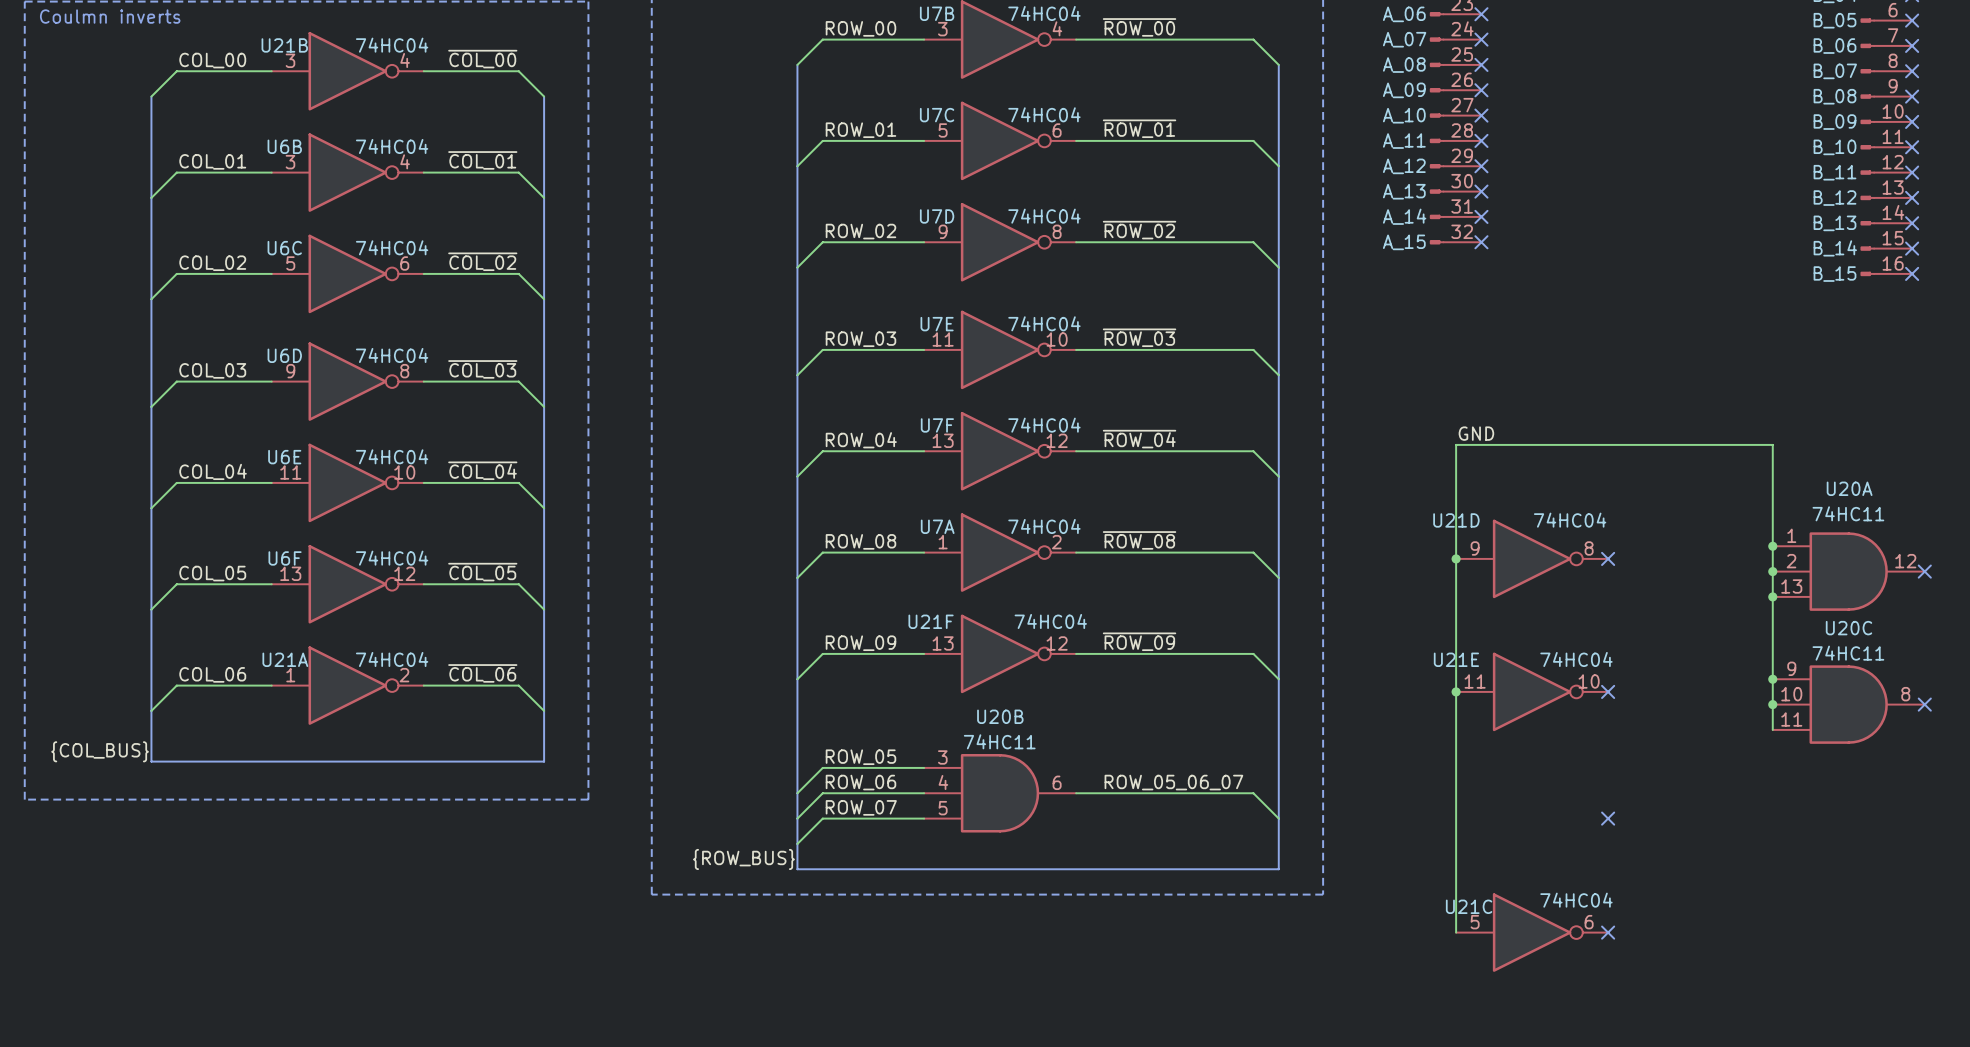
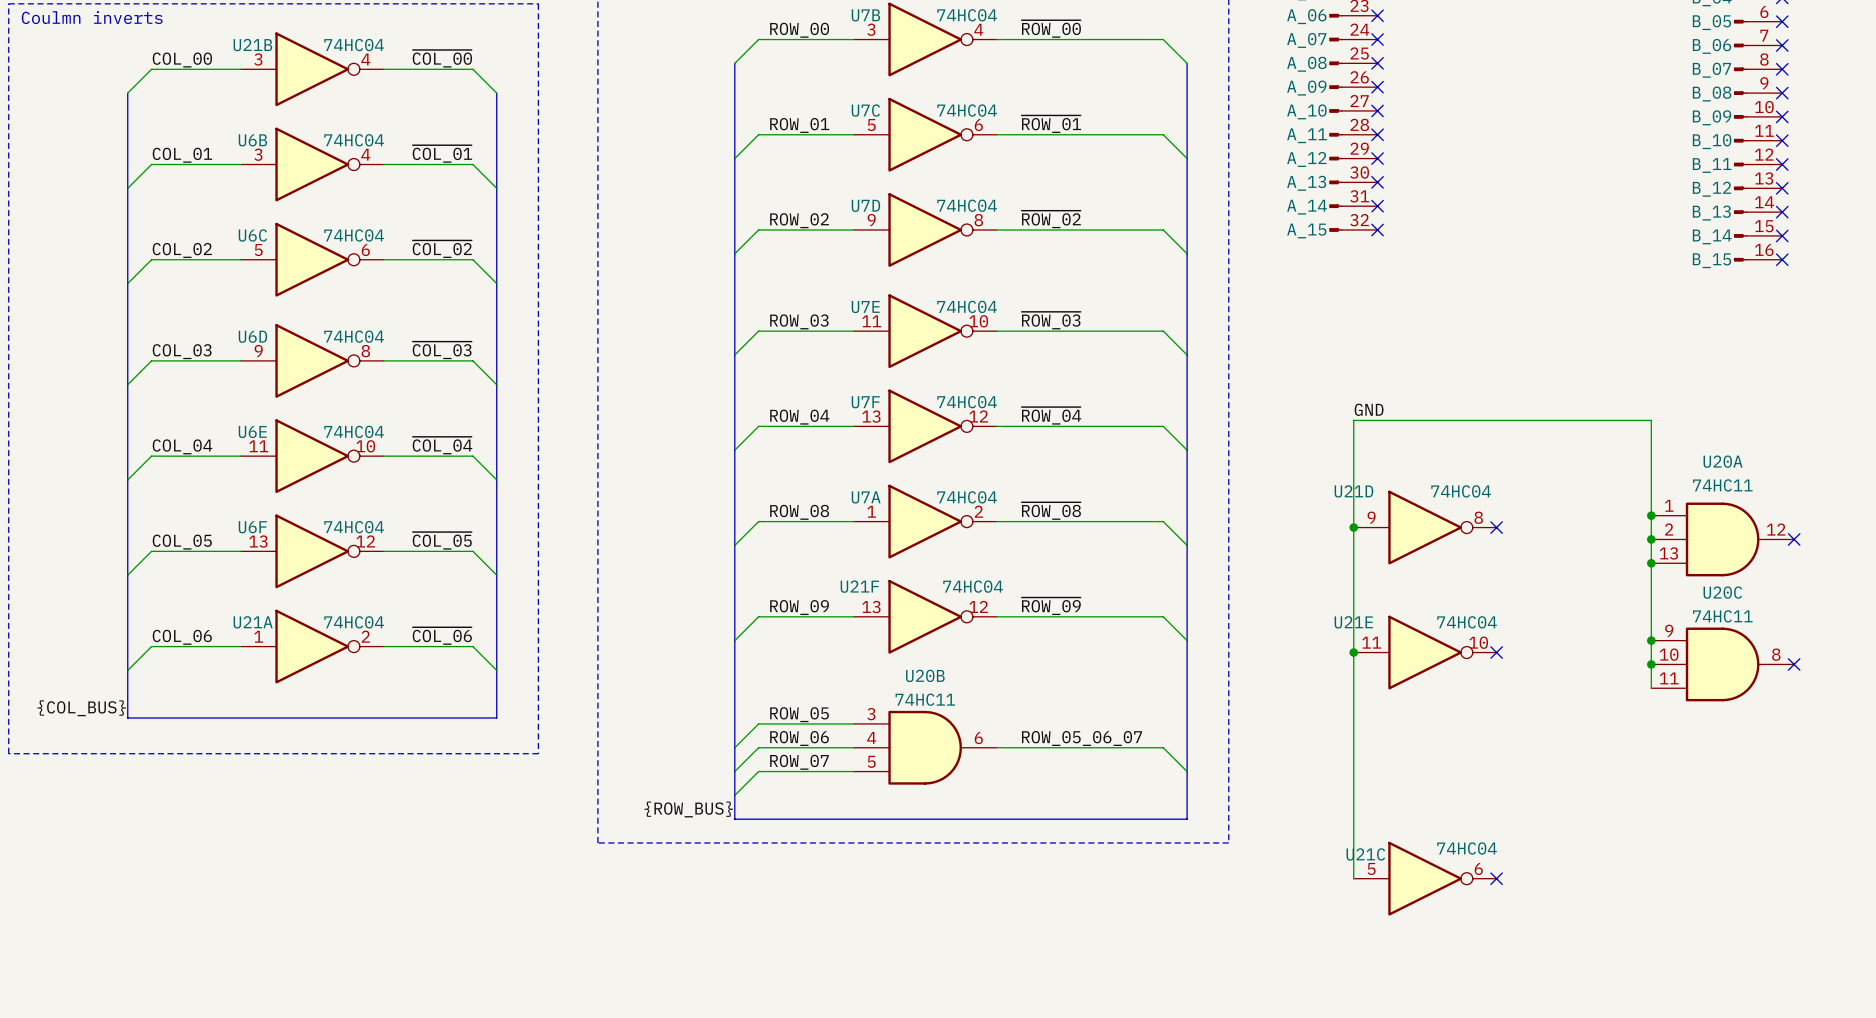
no-connect mark: (1608, 818) -> none

